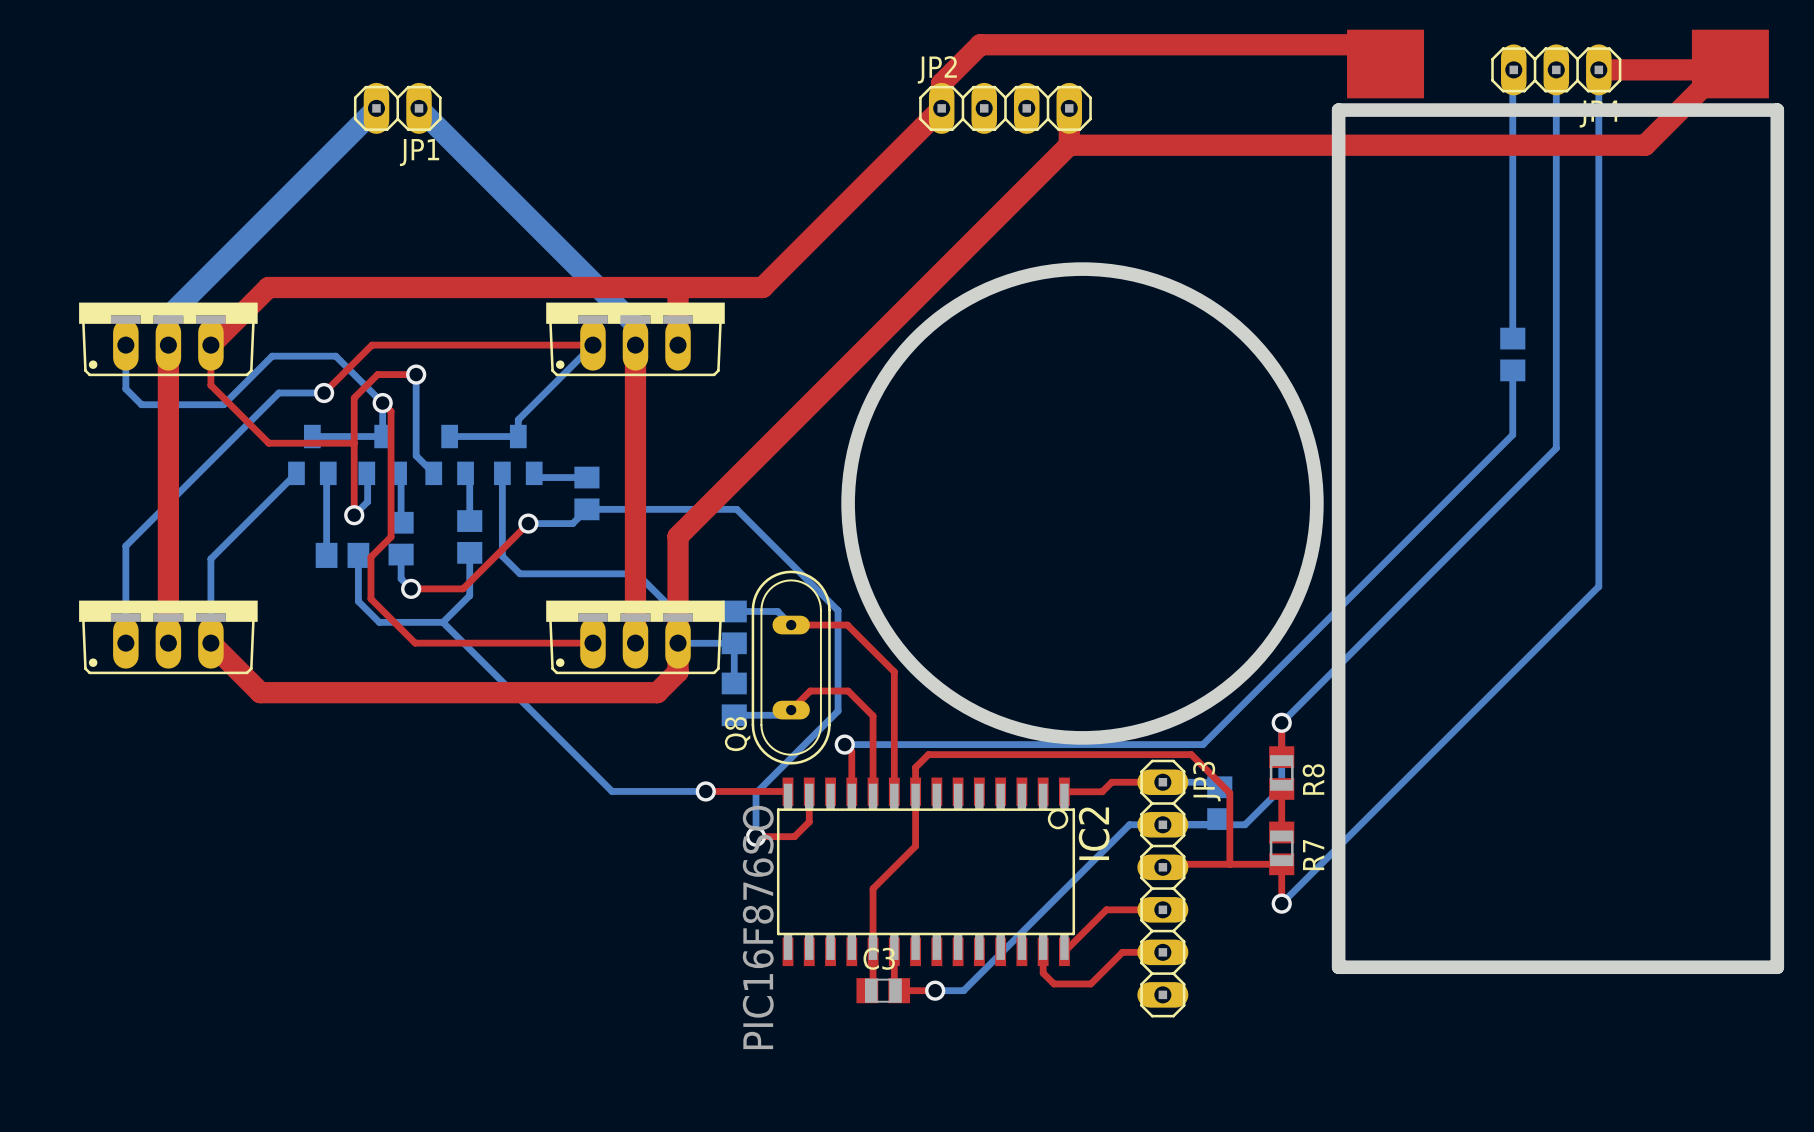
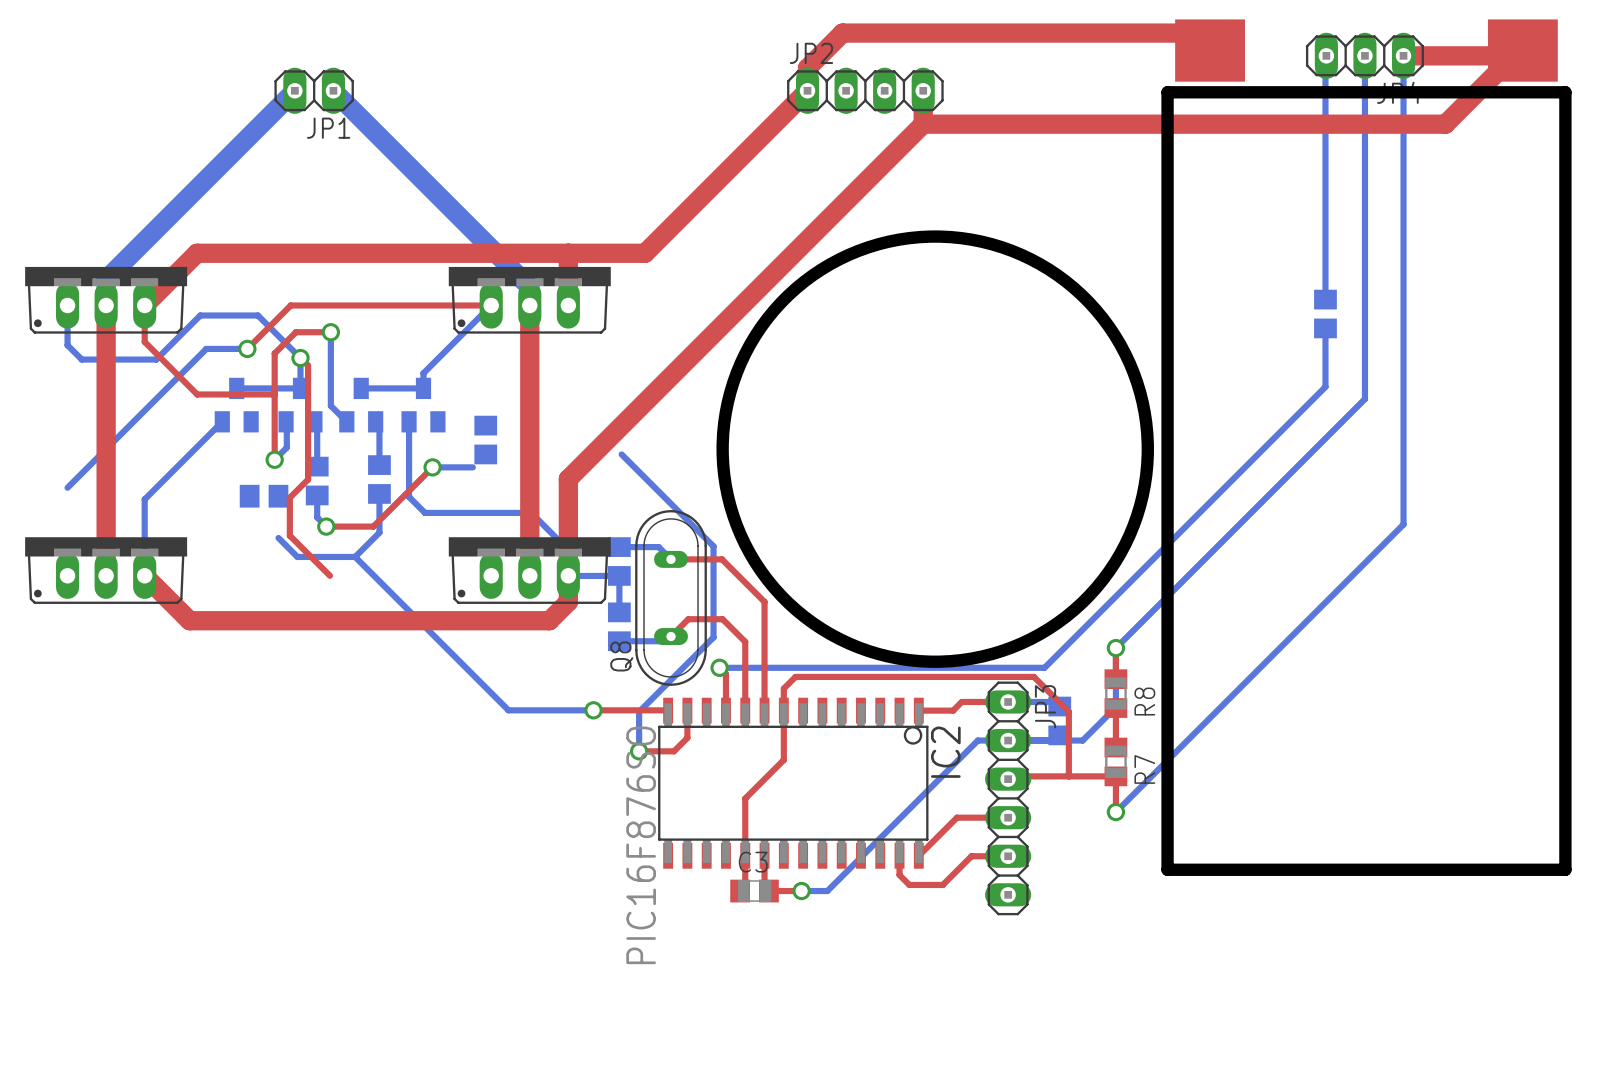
bottom track: (328, 473) (326, 475) (326, 555) -> none
bottom track: (534, 473) (538, 477) (586, 477) -> none
bottom track: (736, 509) (586, 509) (572, 523) -> none
bottom track: (125, 546) (125, 643) -> none
bottom track: (358, 555) (358, 601) -> none
top track: (415, 643) (592, 643) -> none

